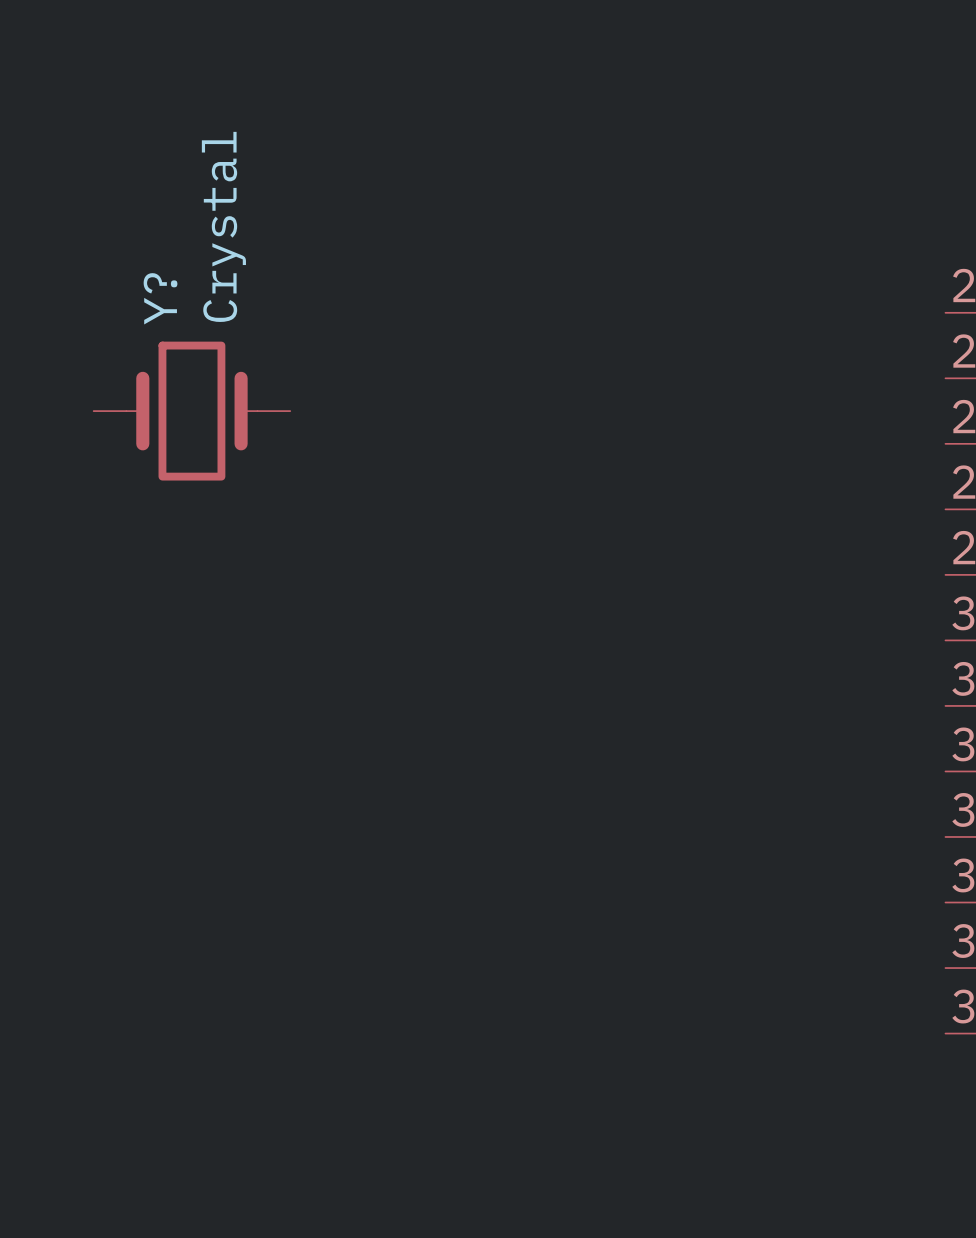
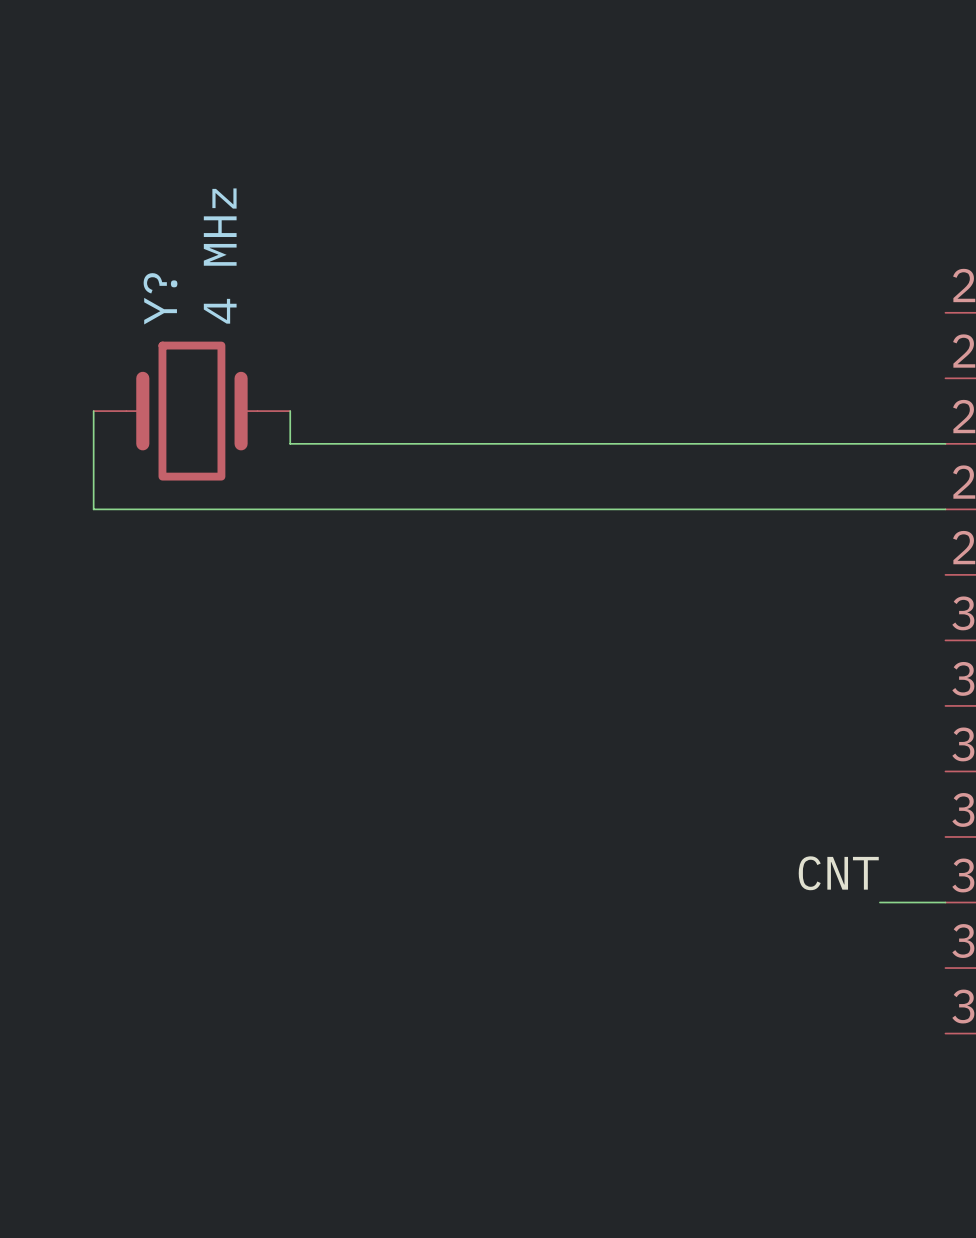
Y? value: Crystal (223, 226) -> 4 MHz (220, 256)
wire: none -> (93, 411) (93, 509) (945, 509)
wire: none -> (290, 411) (290, 443) (945, 443)
label: none -> CNT (838, 873)
wire: none -> (879, 902) (945, 902)

